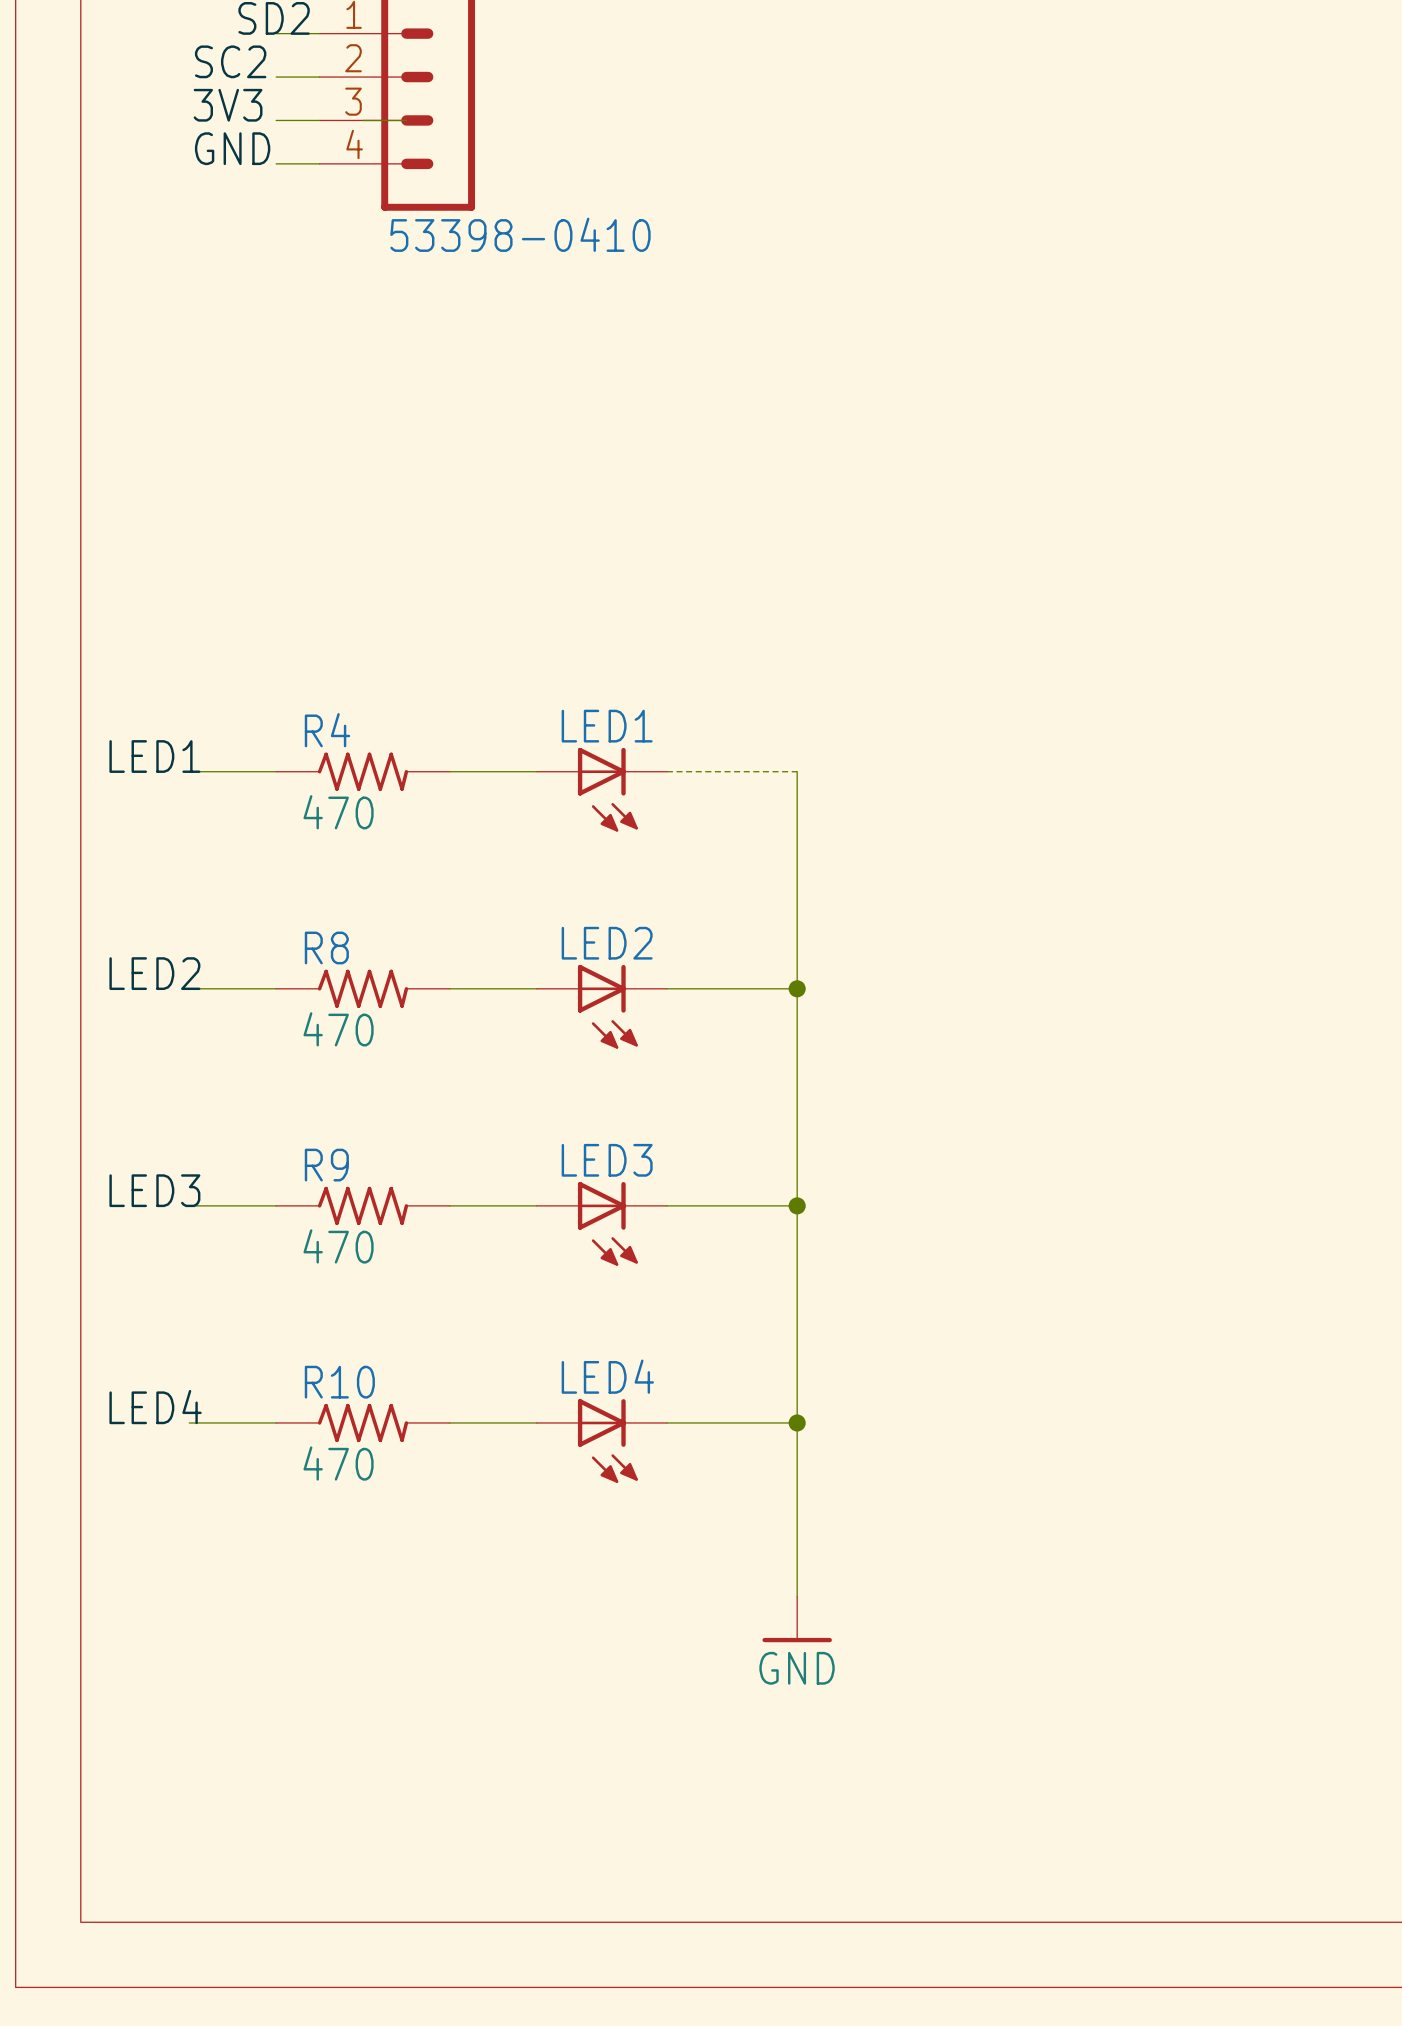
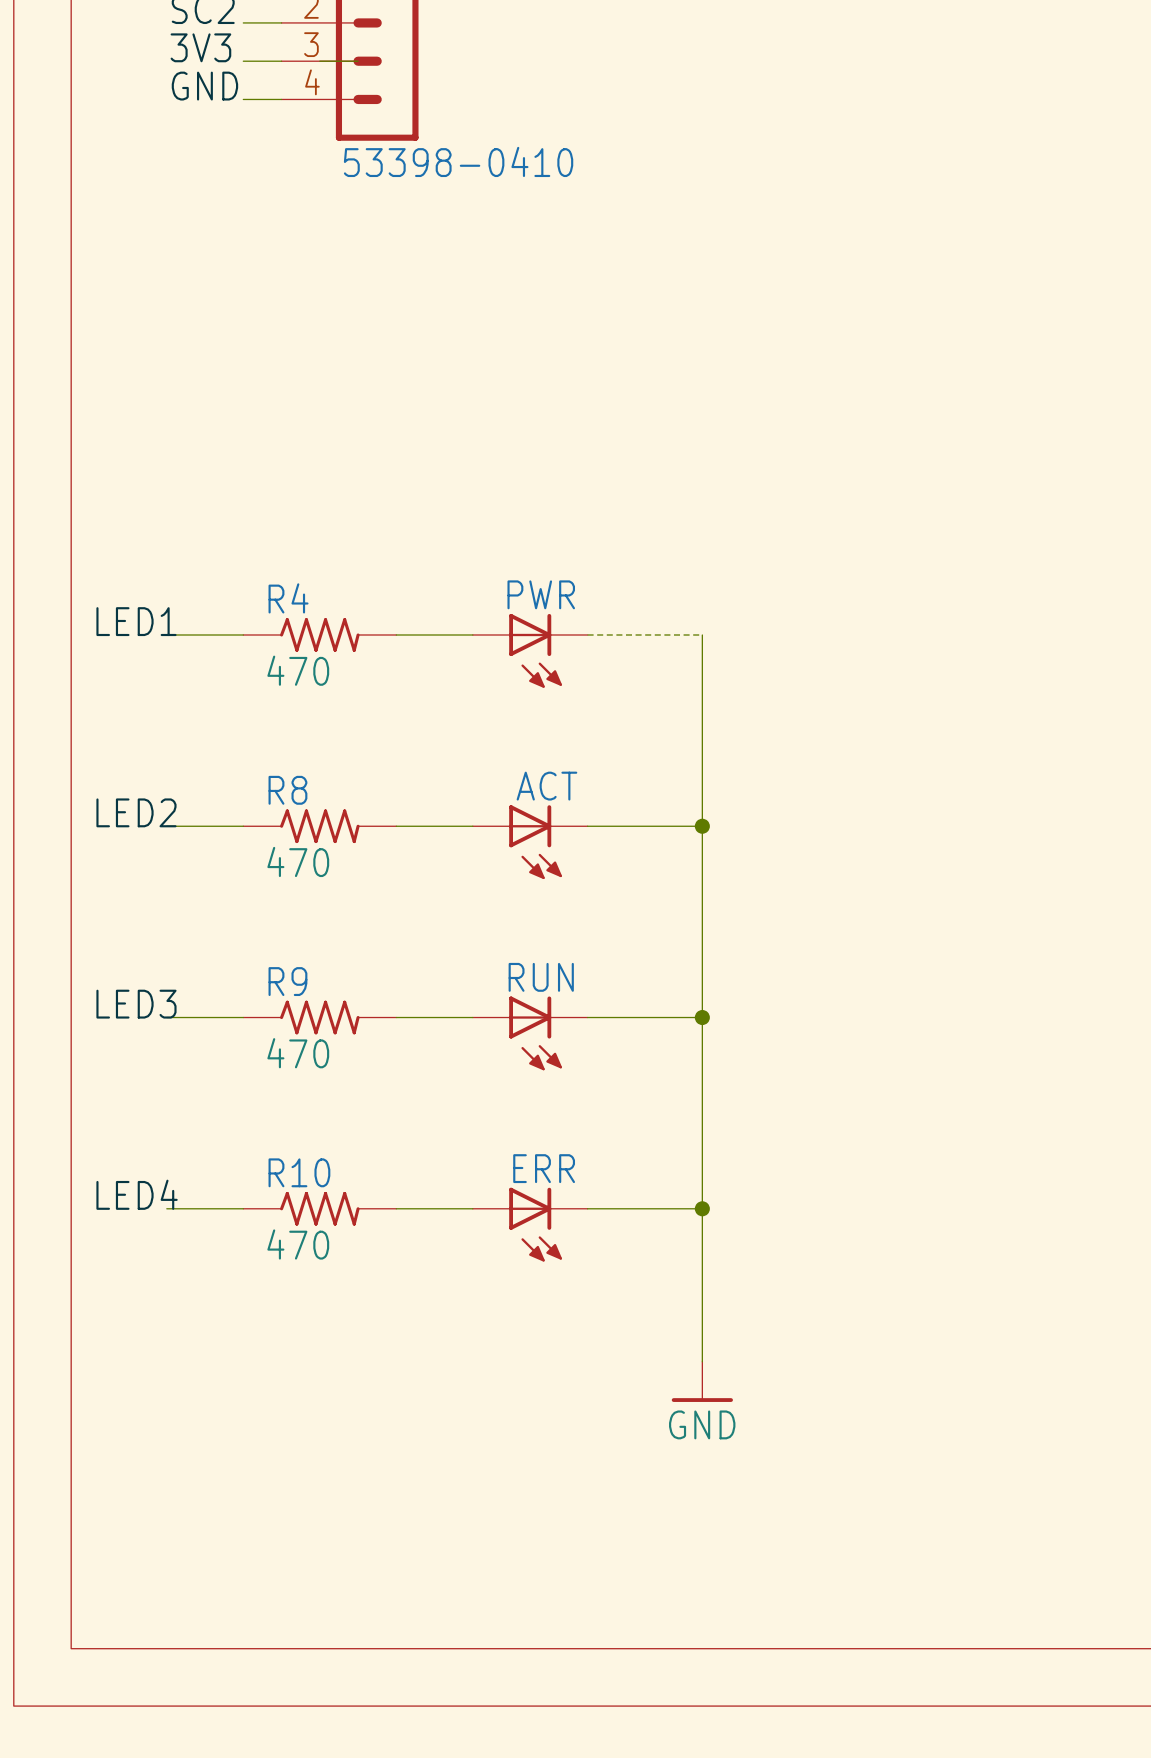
LED1 name: LED1 (607, 726) -> PWR (541, 594)
LED2 name: LED2 (607, 943) -> ACT (546, 786)
LED3 name: LED3 (607, 1160) -> RUN (541, 977)
LED4 name: LED4 (607, 1376) -> ERR (544, 1168)

